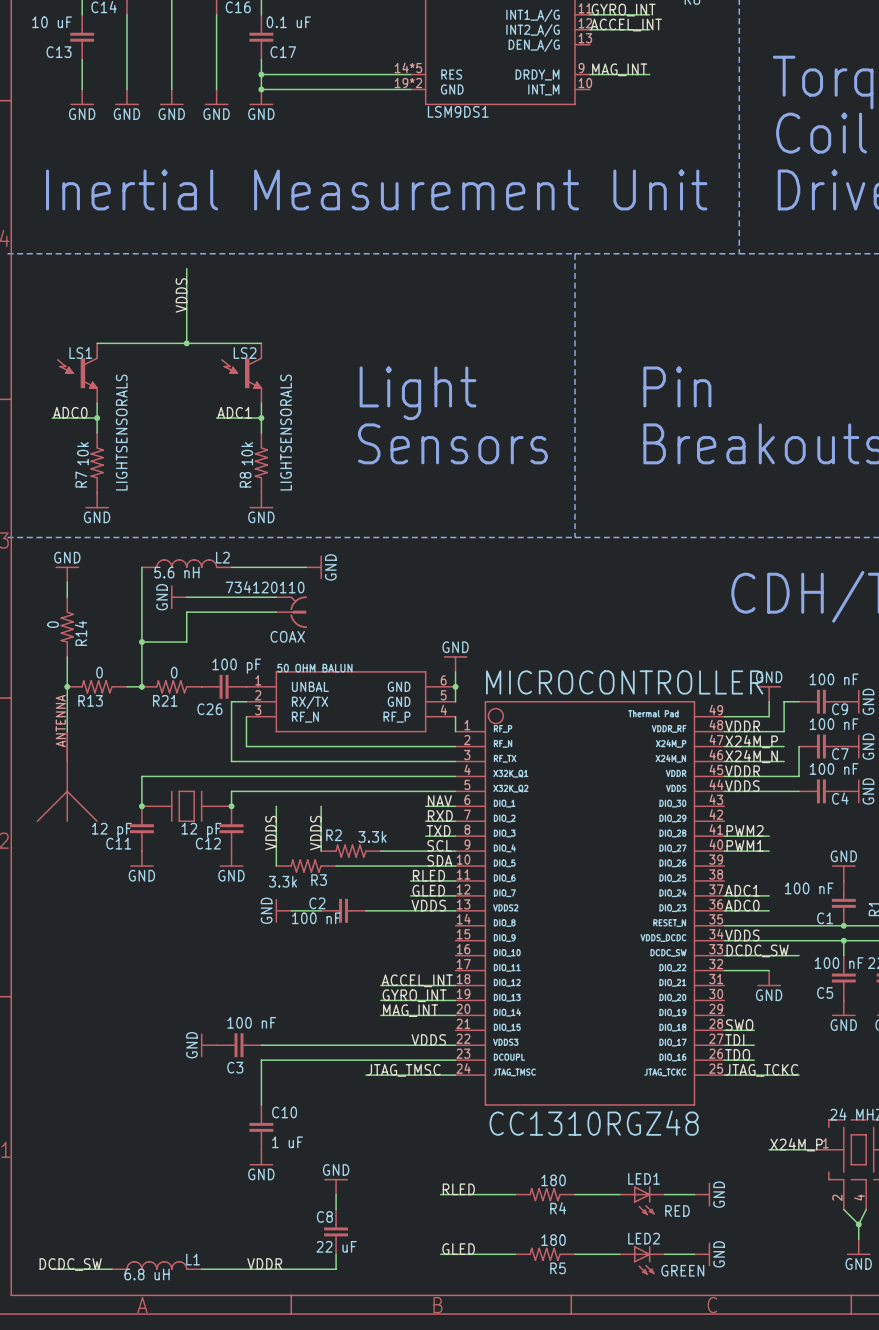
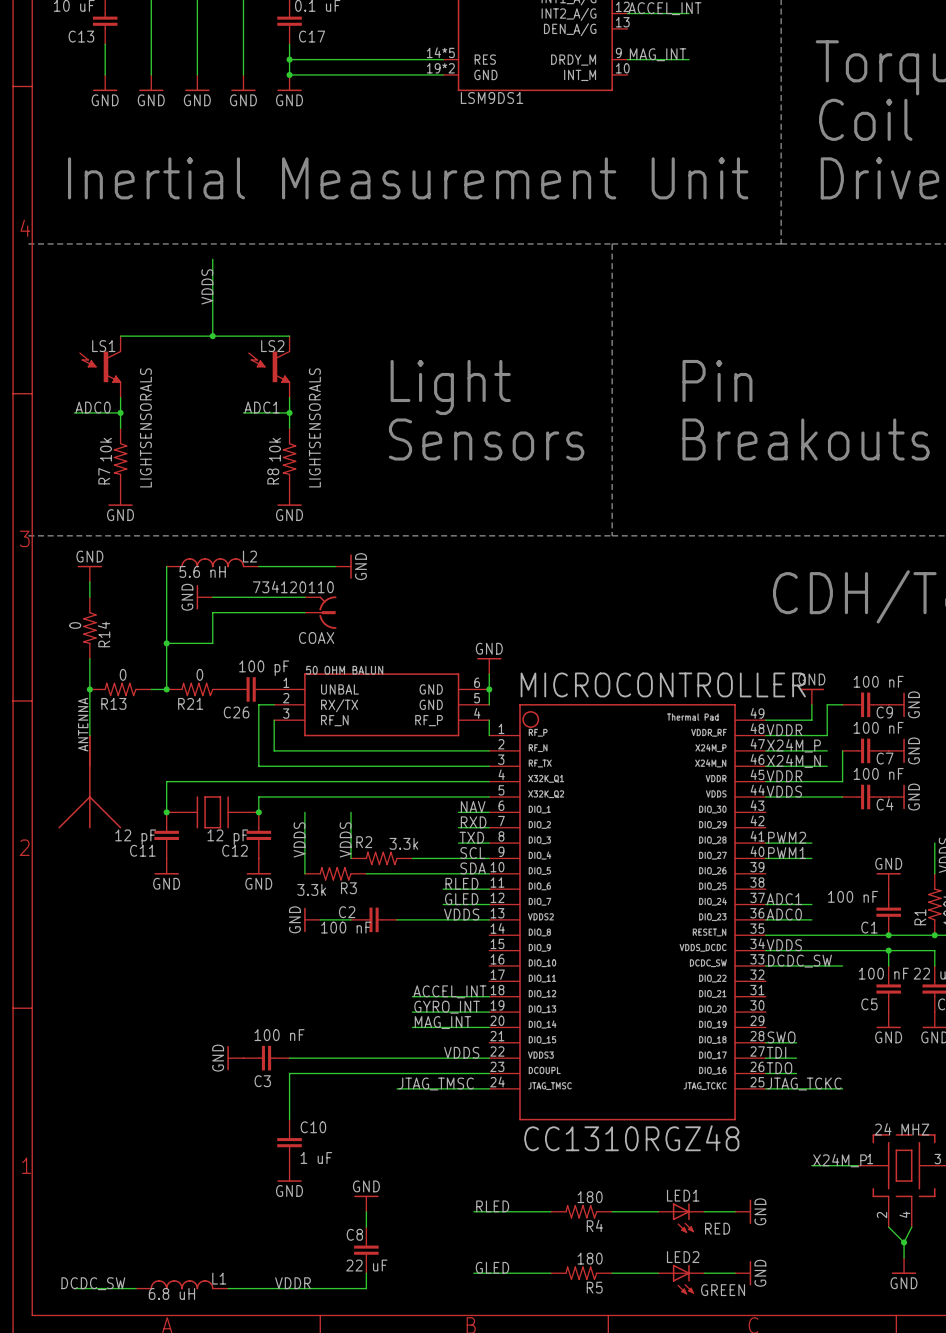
wire: (724, 970) (769, 970) -> none
power symbol: GND (769, 978) -> none

